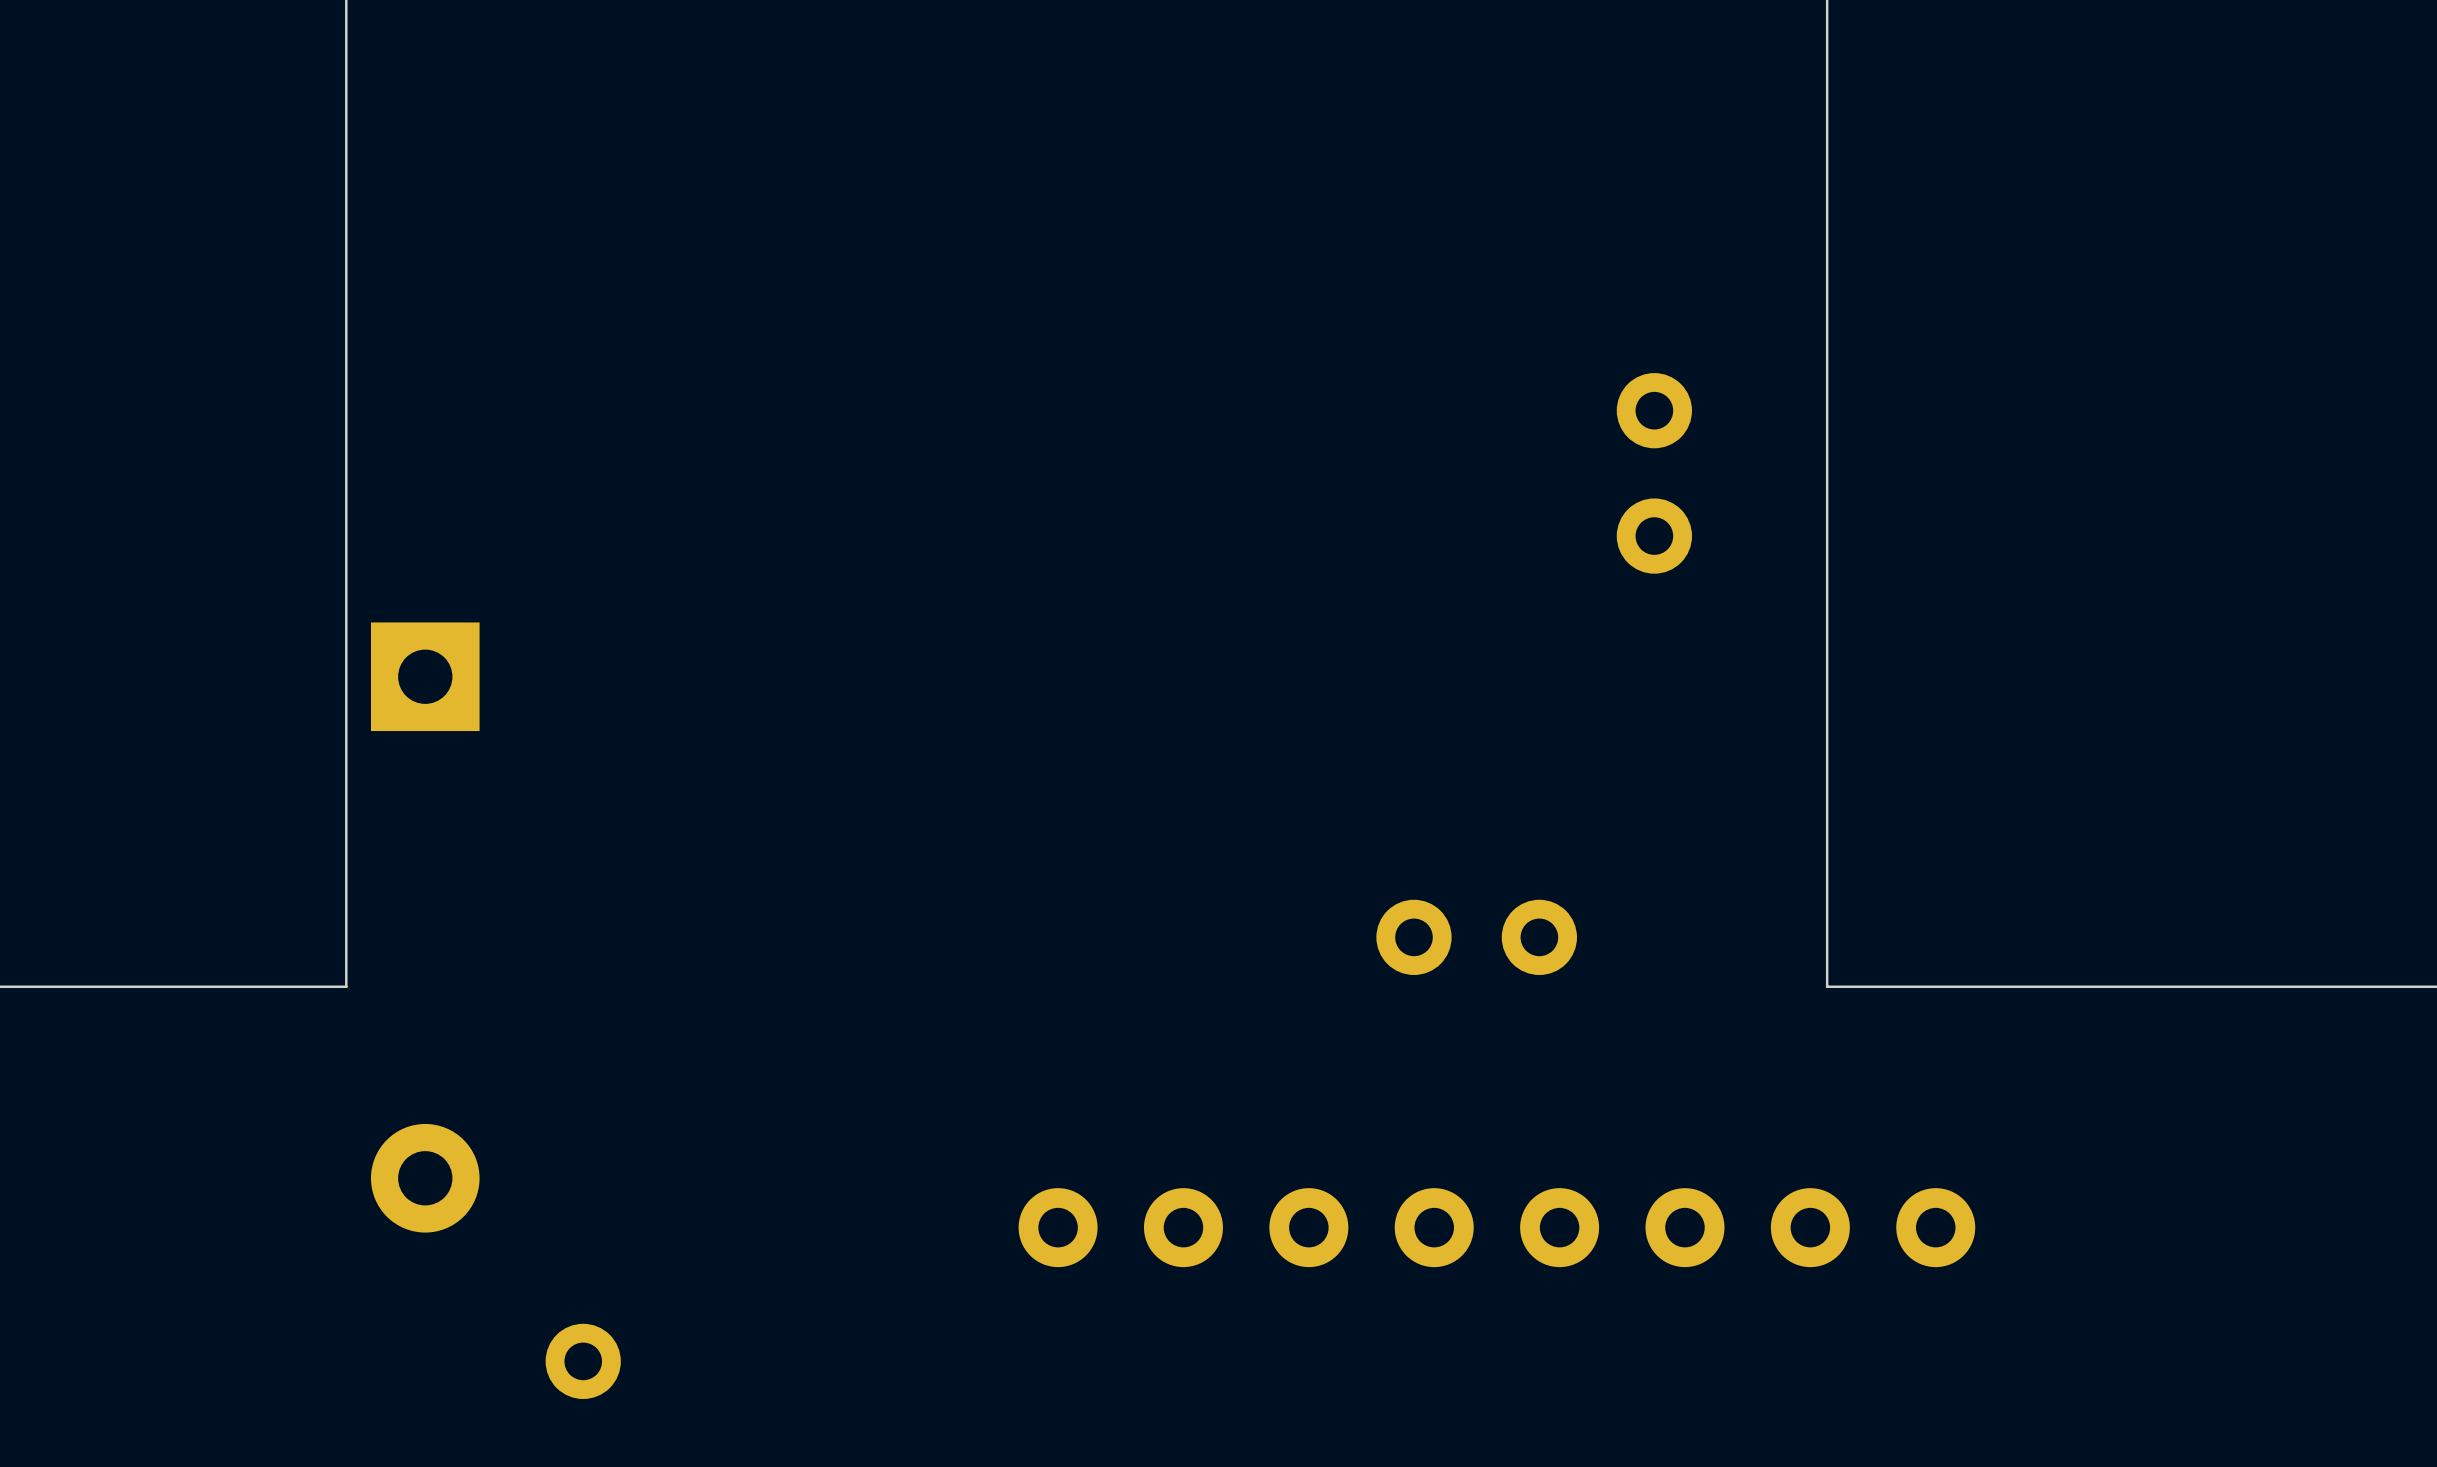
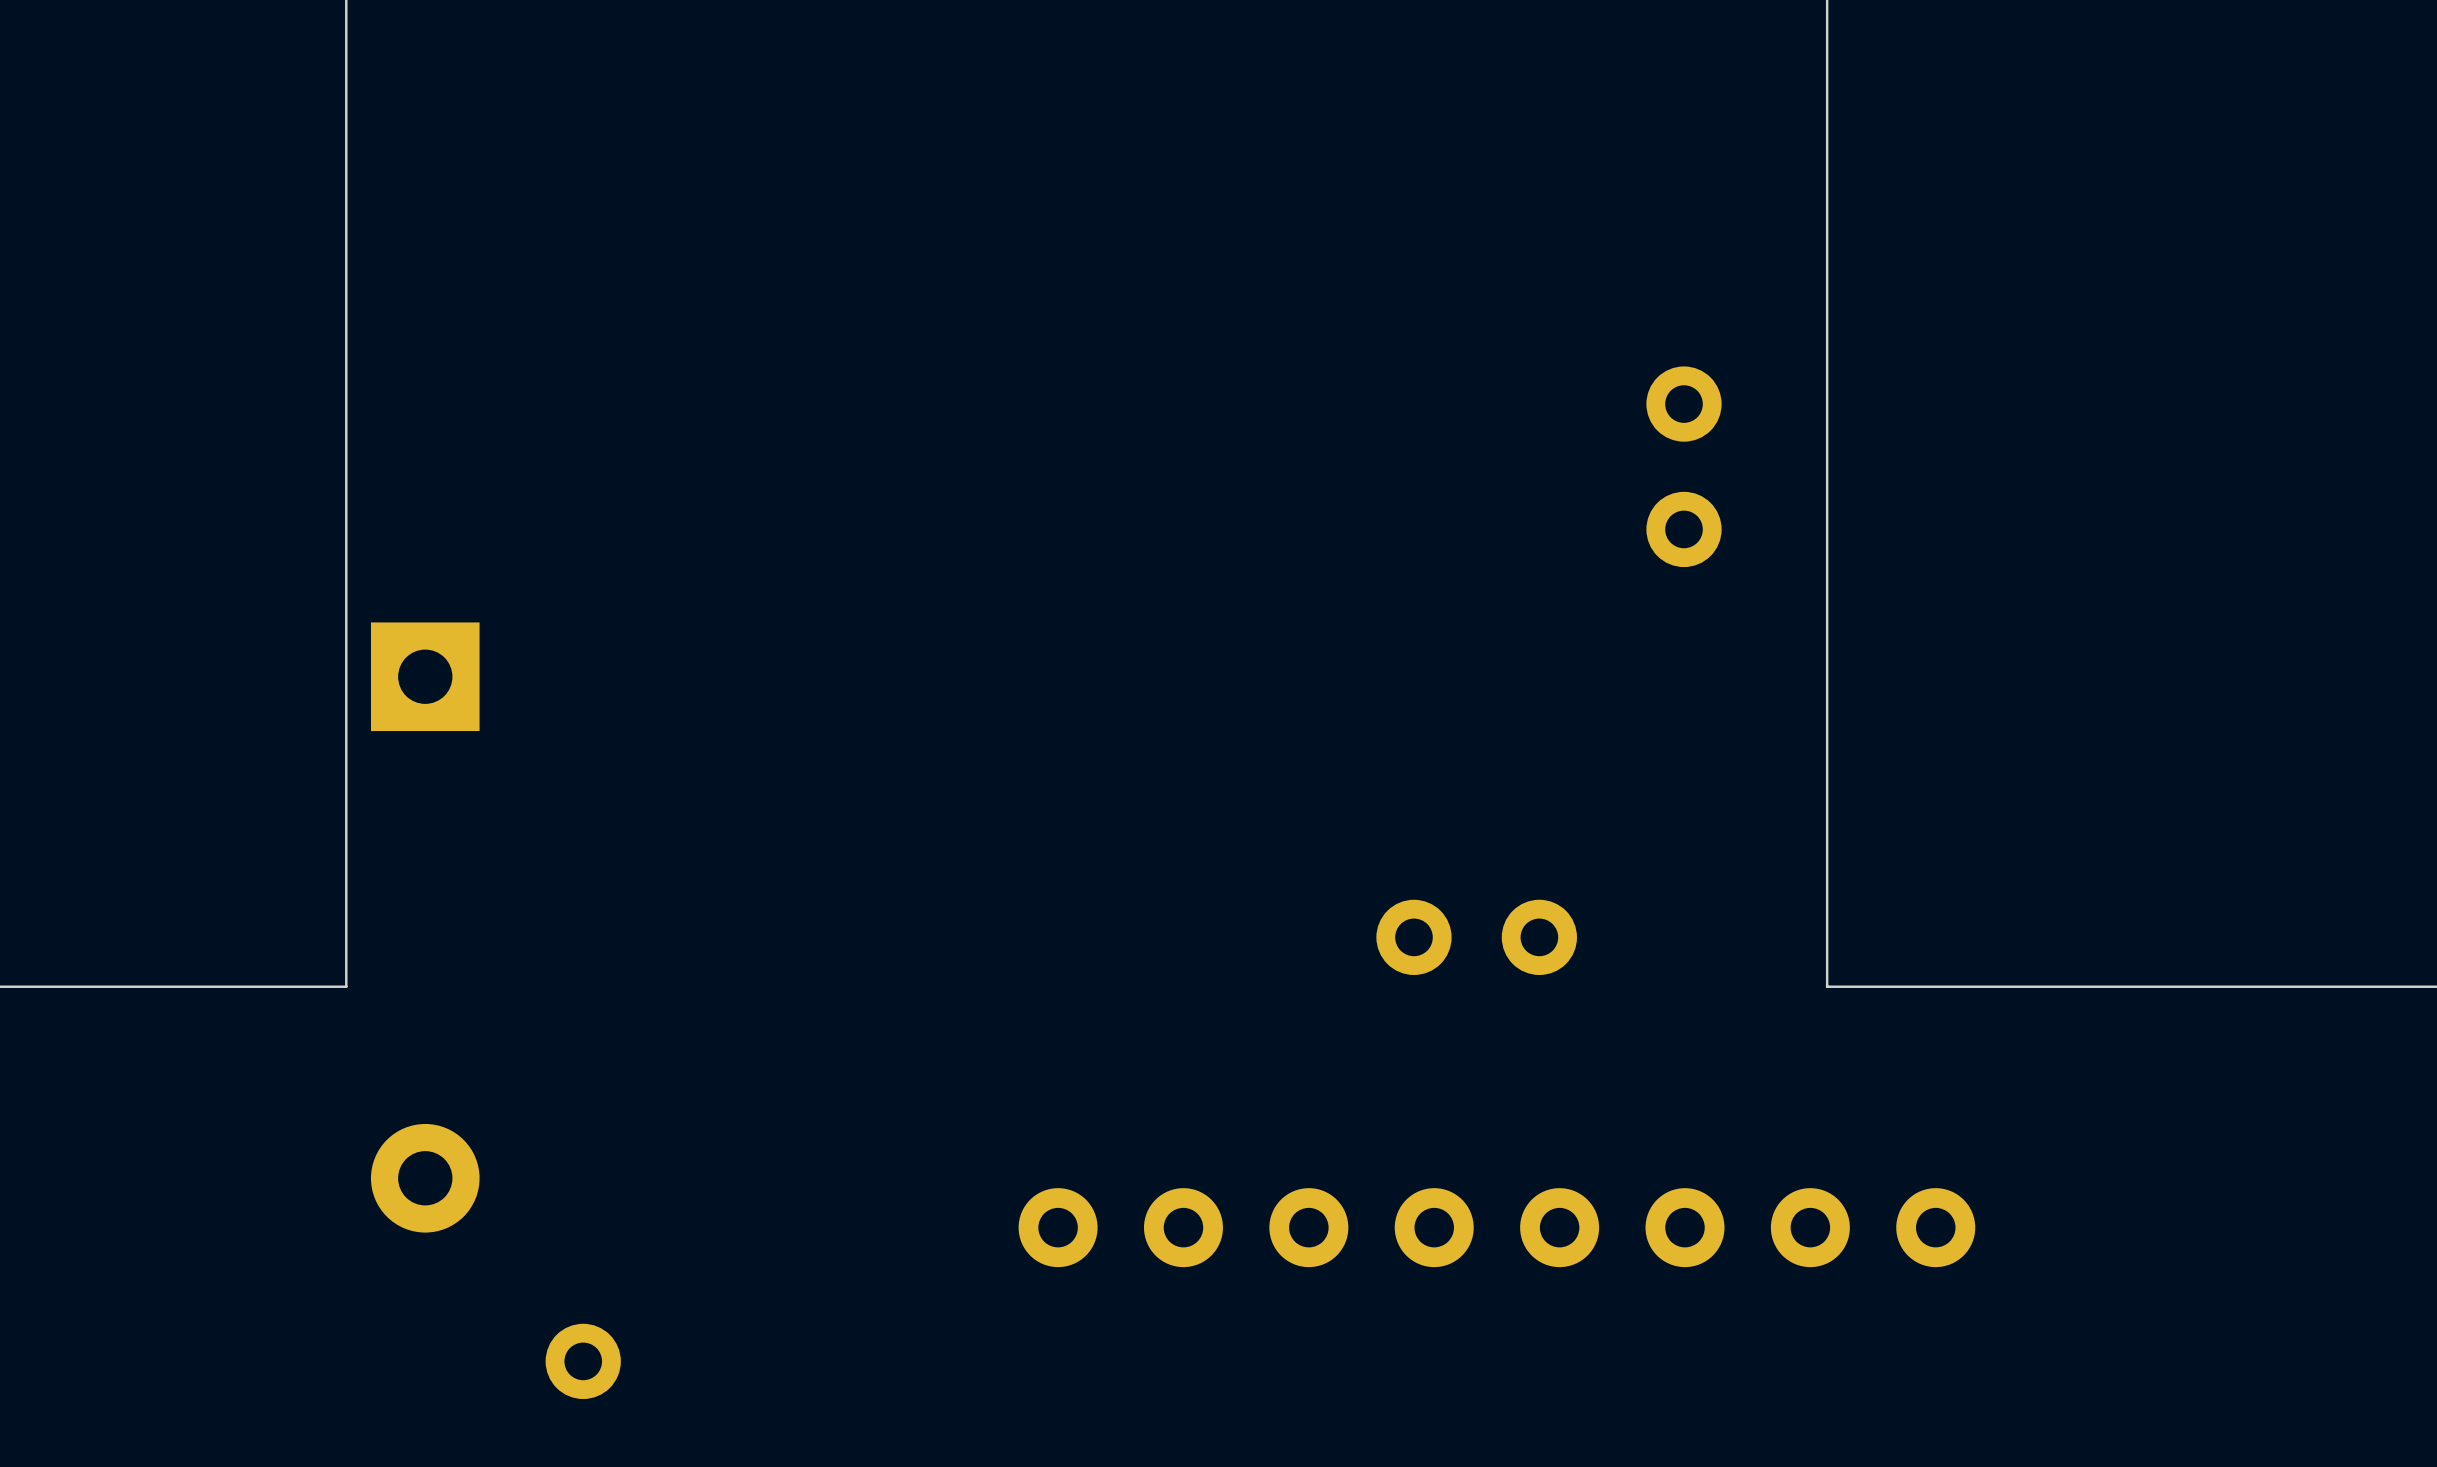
part position: (1654, 473) -> (1684, 466)

